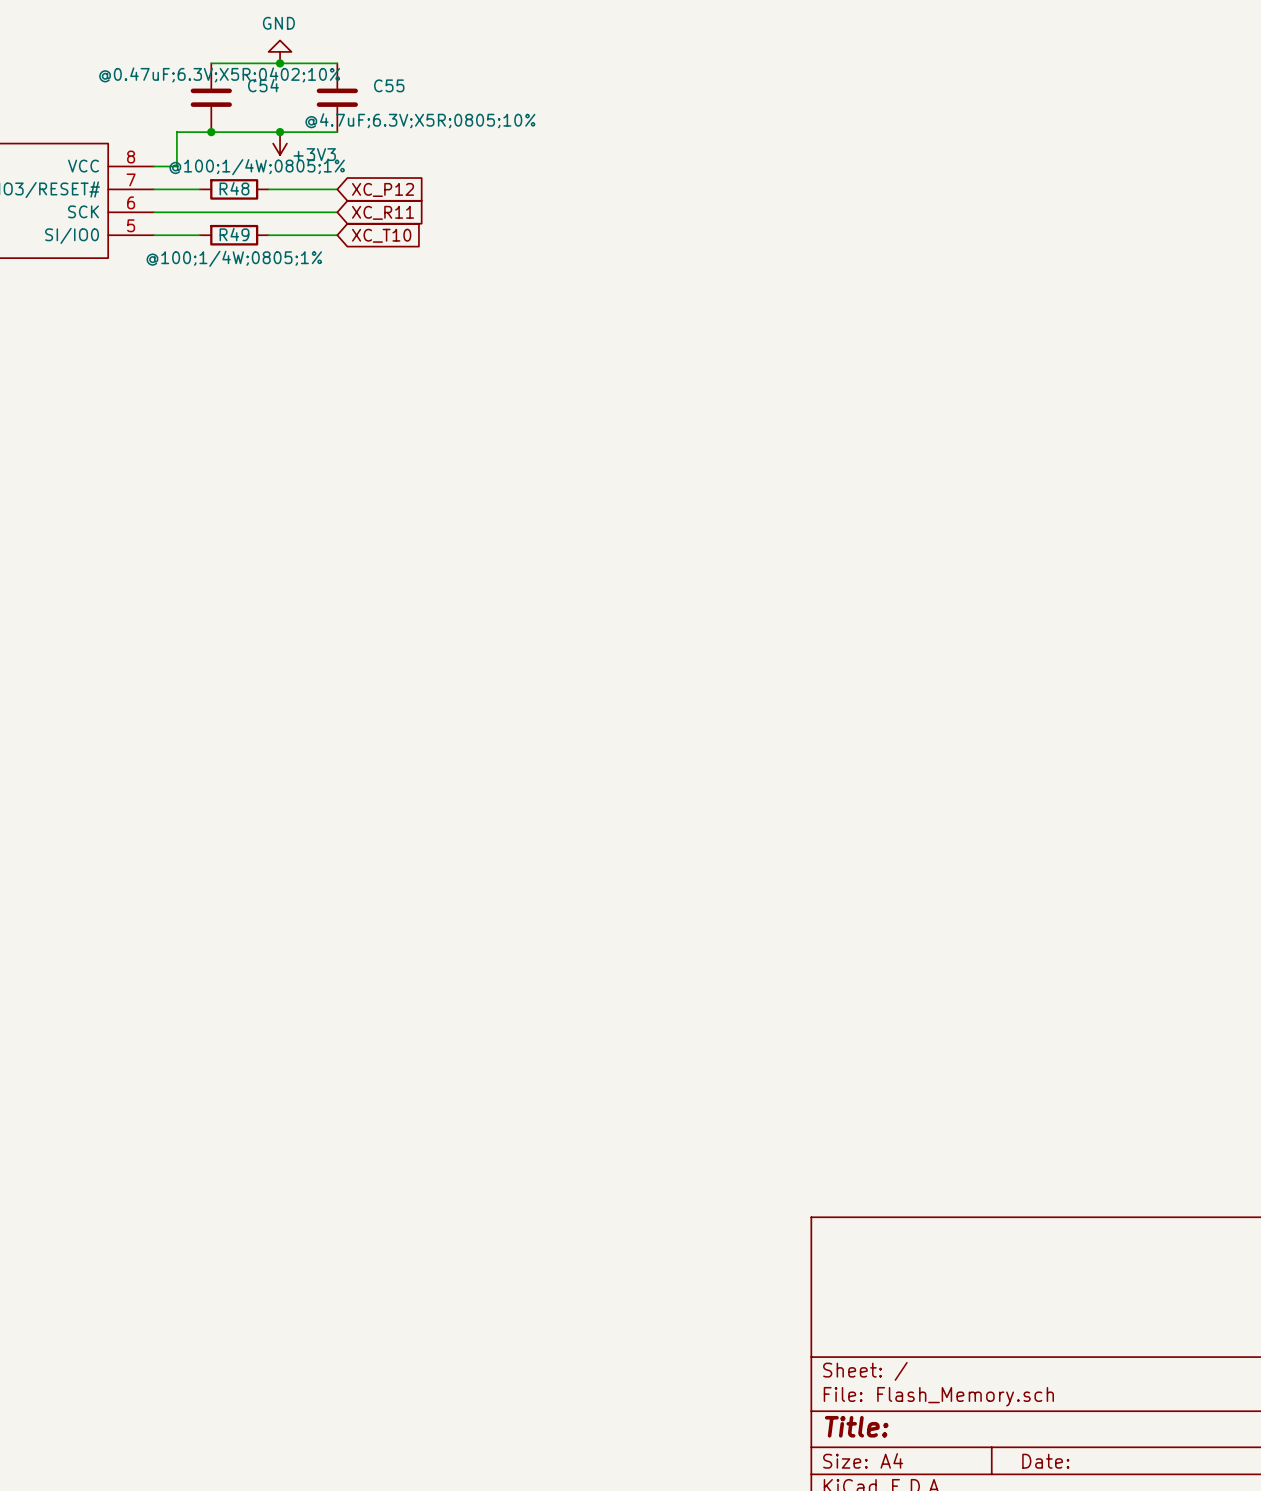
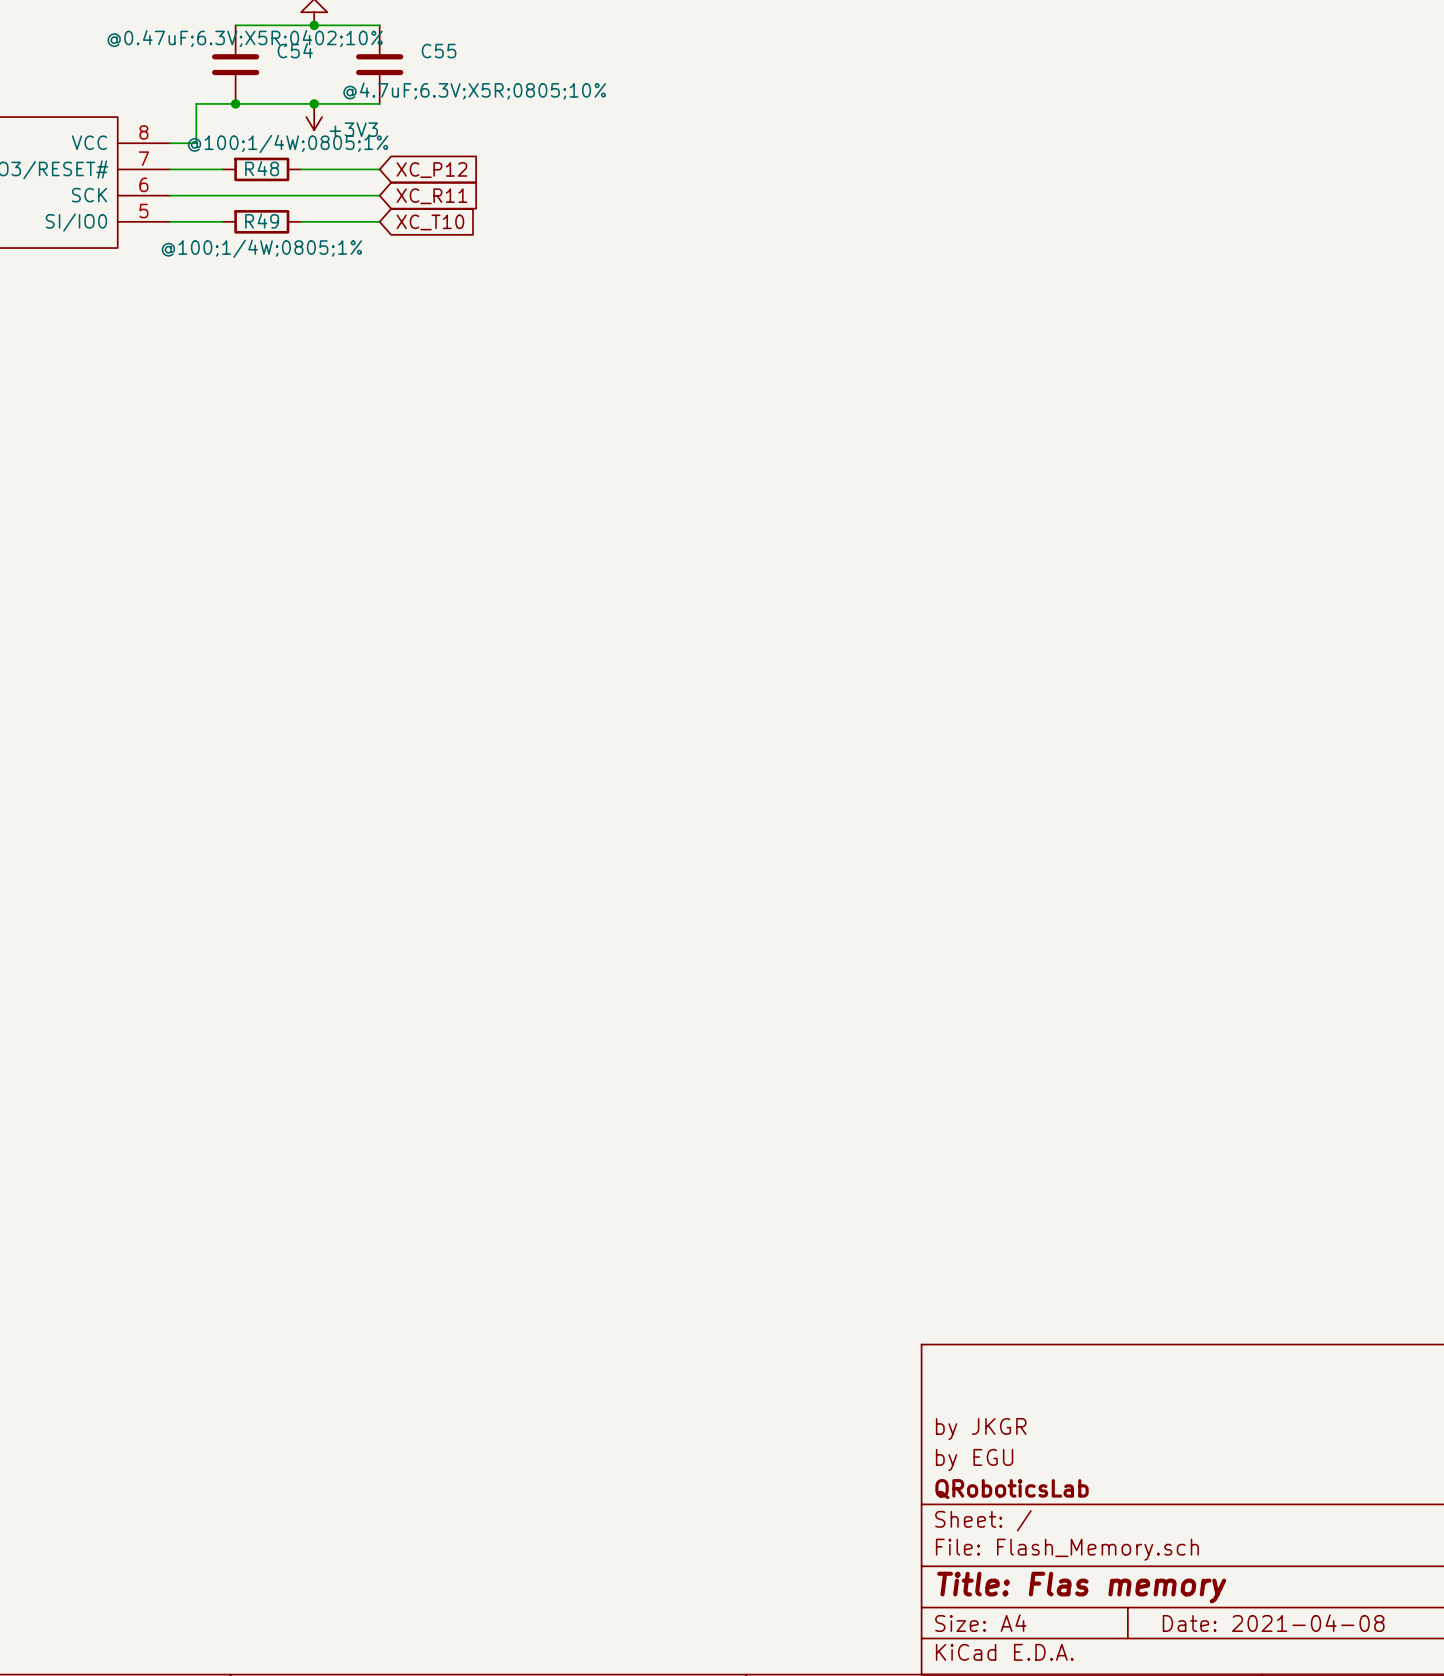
title block: none -> by JKGR (981, 1429)
title block: none -> by EGU (974, 1460)
title block: none -> QRoboticsLab (1012, 1489)
title block: Title: (856, 1426) -> Title: Flas memory (1081, 1587)
title block: Date: (1045, 1461) -> Date: 2021-04-08 (1273, 1623)

